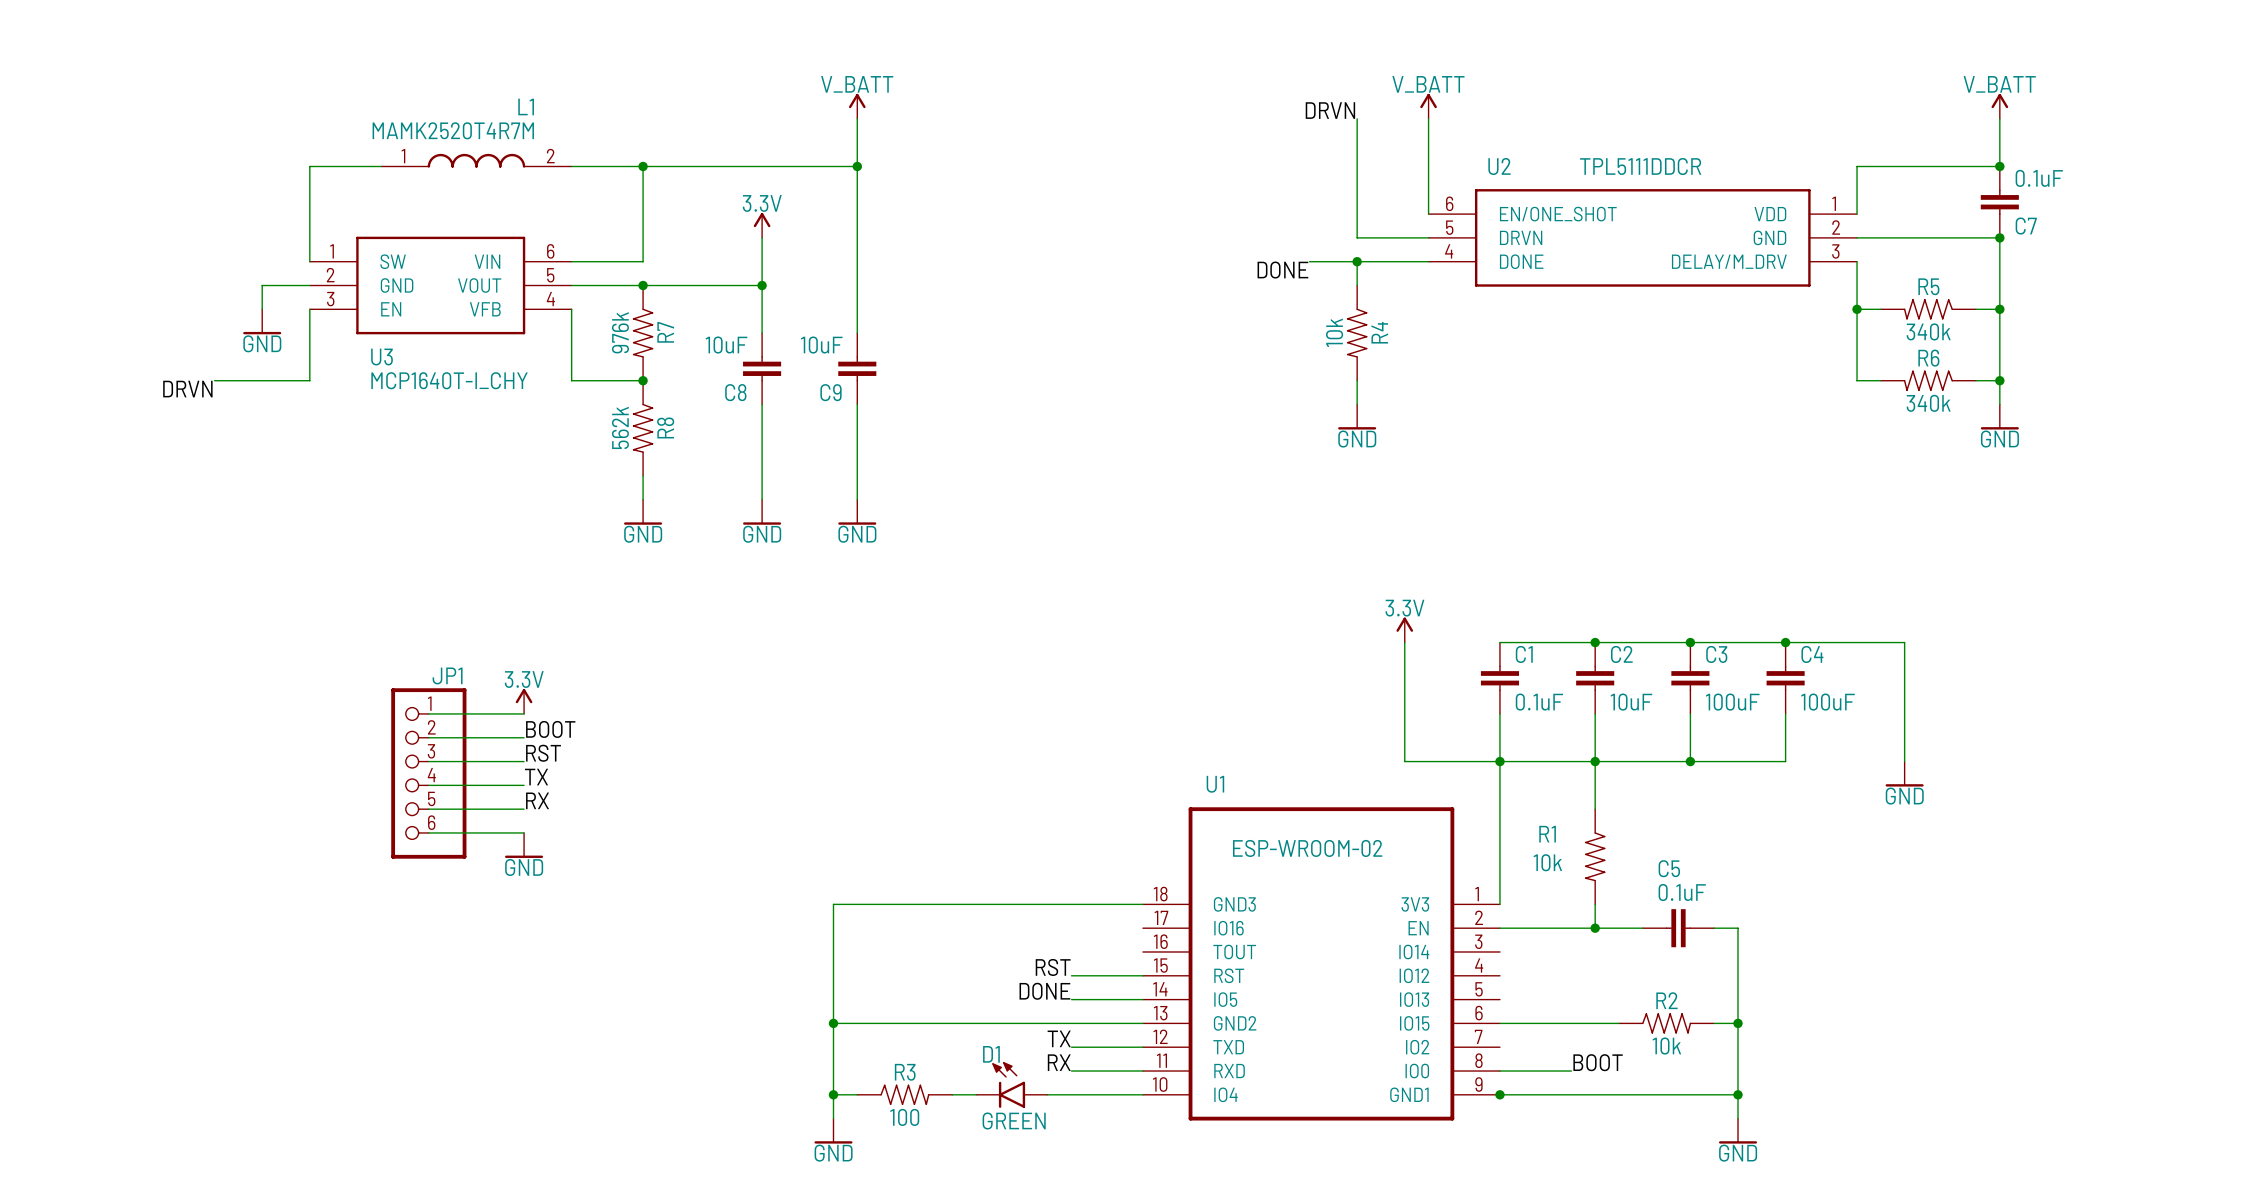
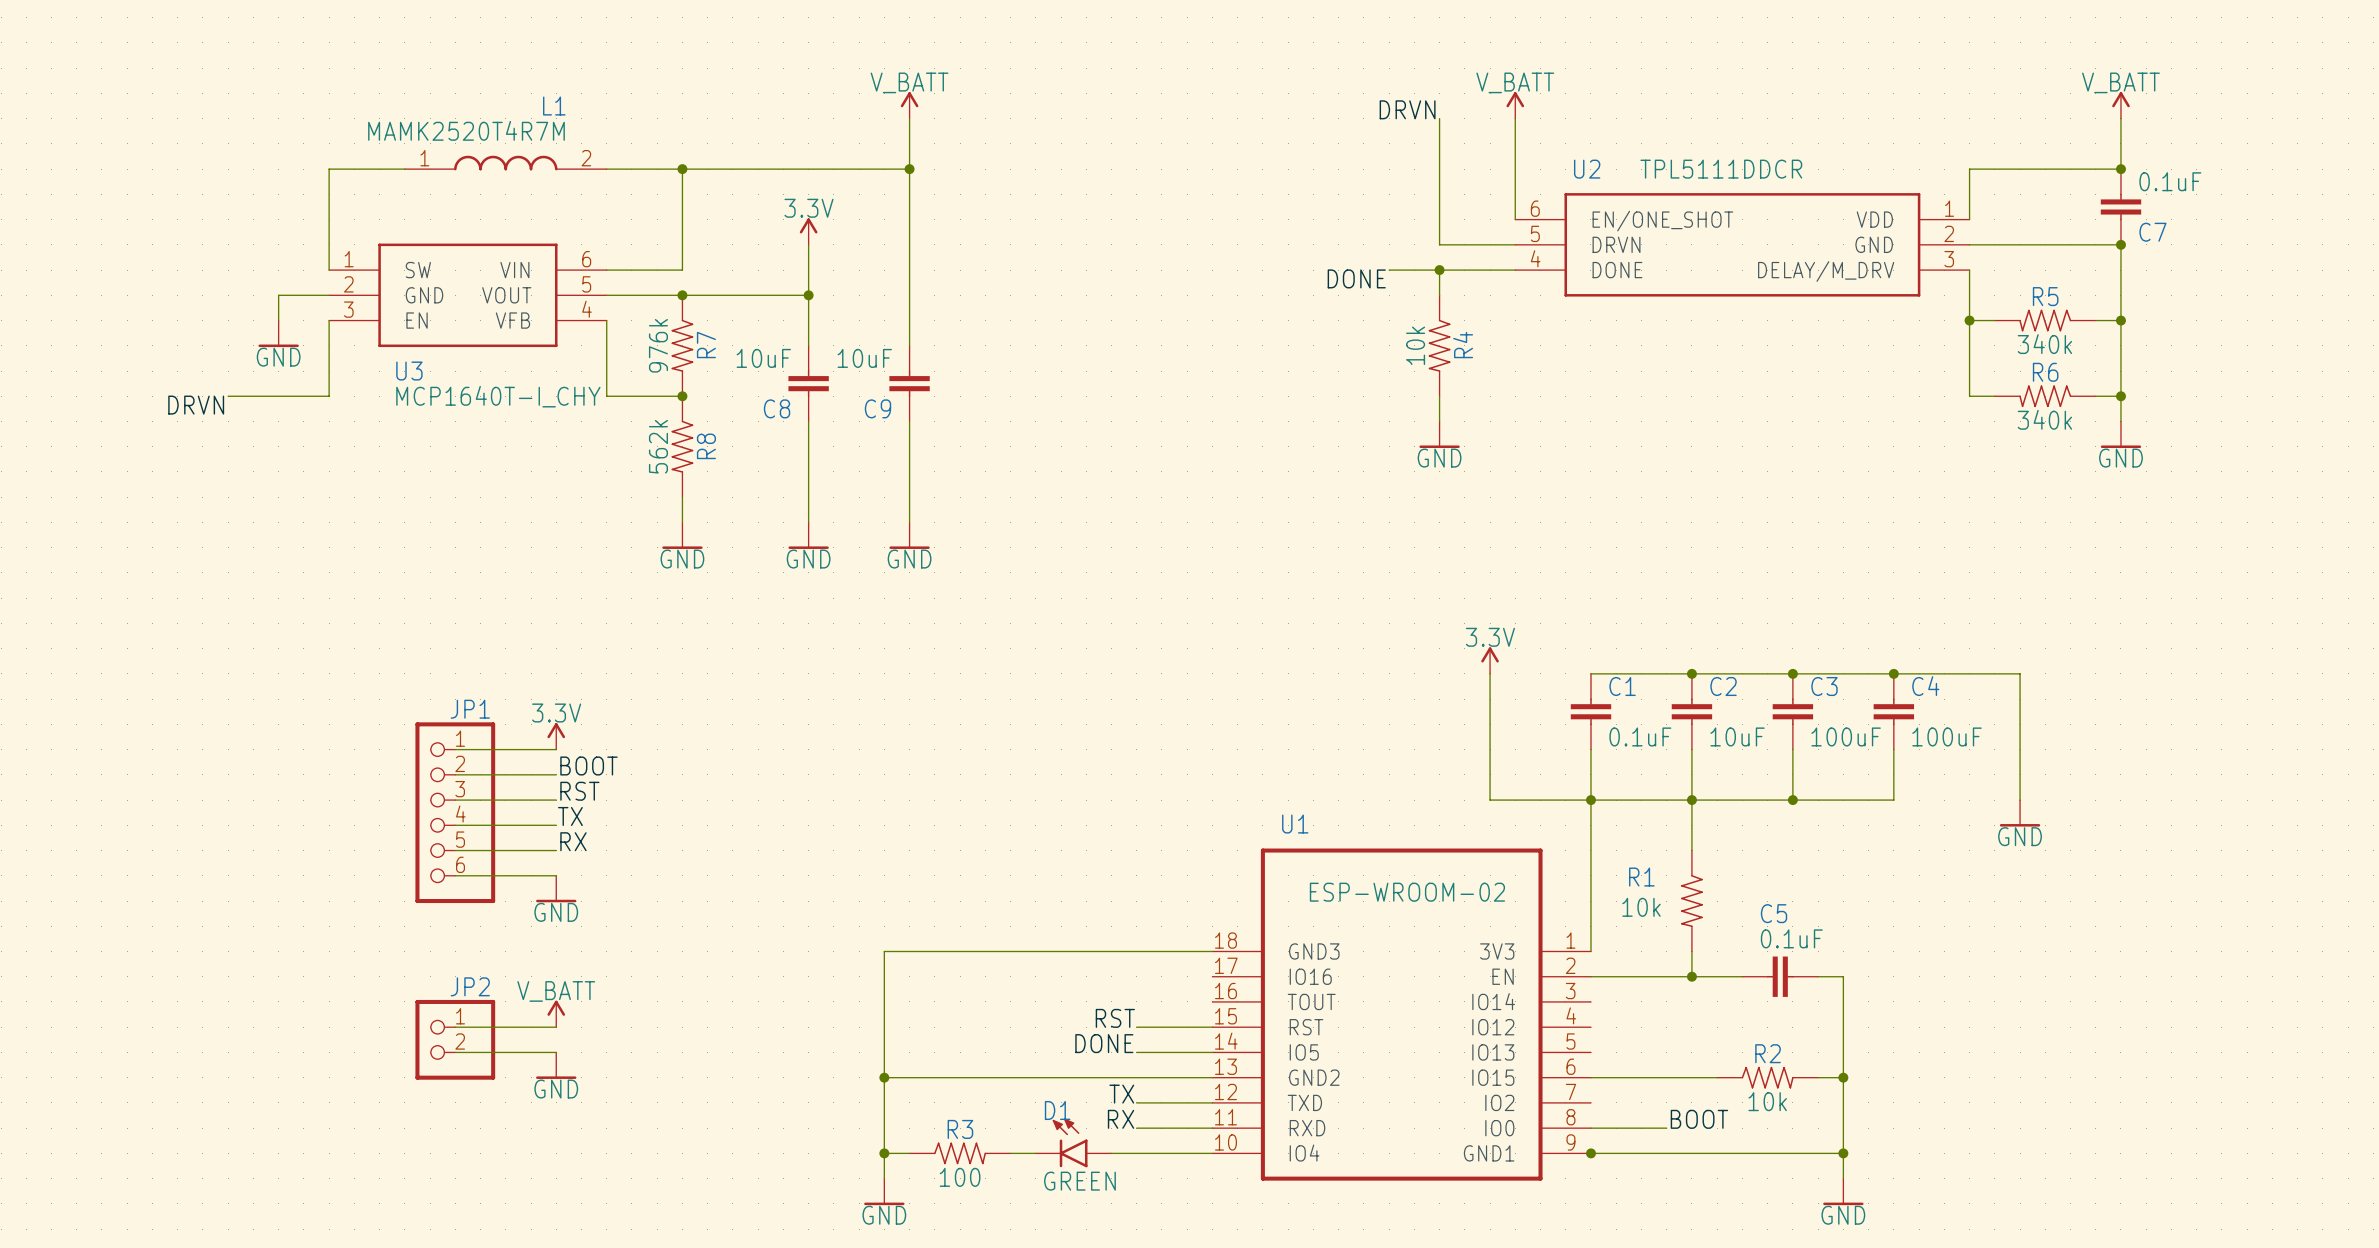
power symbol: none -> V_BATT (556, 1013)
wire: none -> (455, 1027) (556, 1027)
JP2: none -> (455, 1039)
wire: none -> (455, 1052) (556, 1052)
power symbol: none -> GND (556, 1065)

